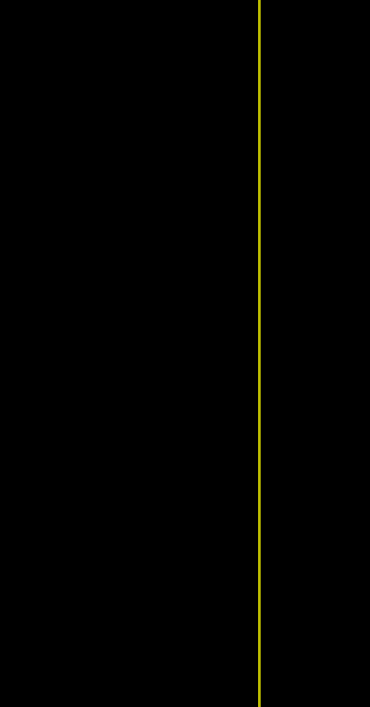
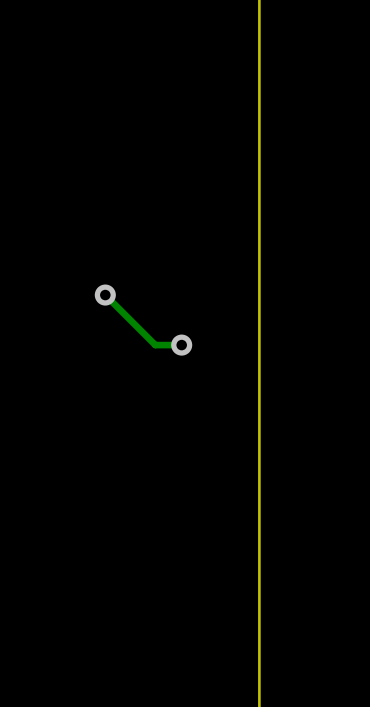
track: none -> (105, 295) (155, 345) (181, 345)
via: none -> (105, 295)
via: none -> (181, 345)

